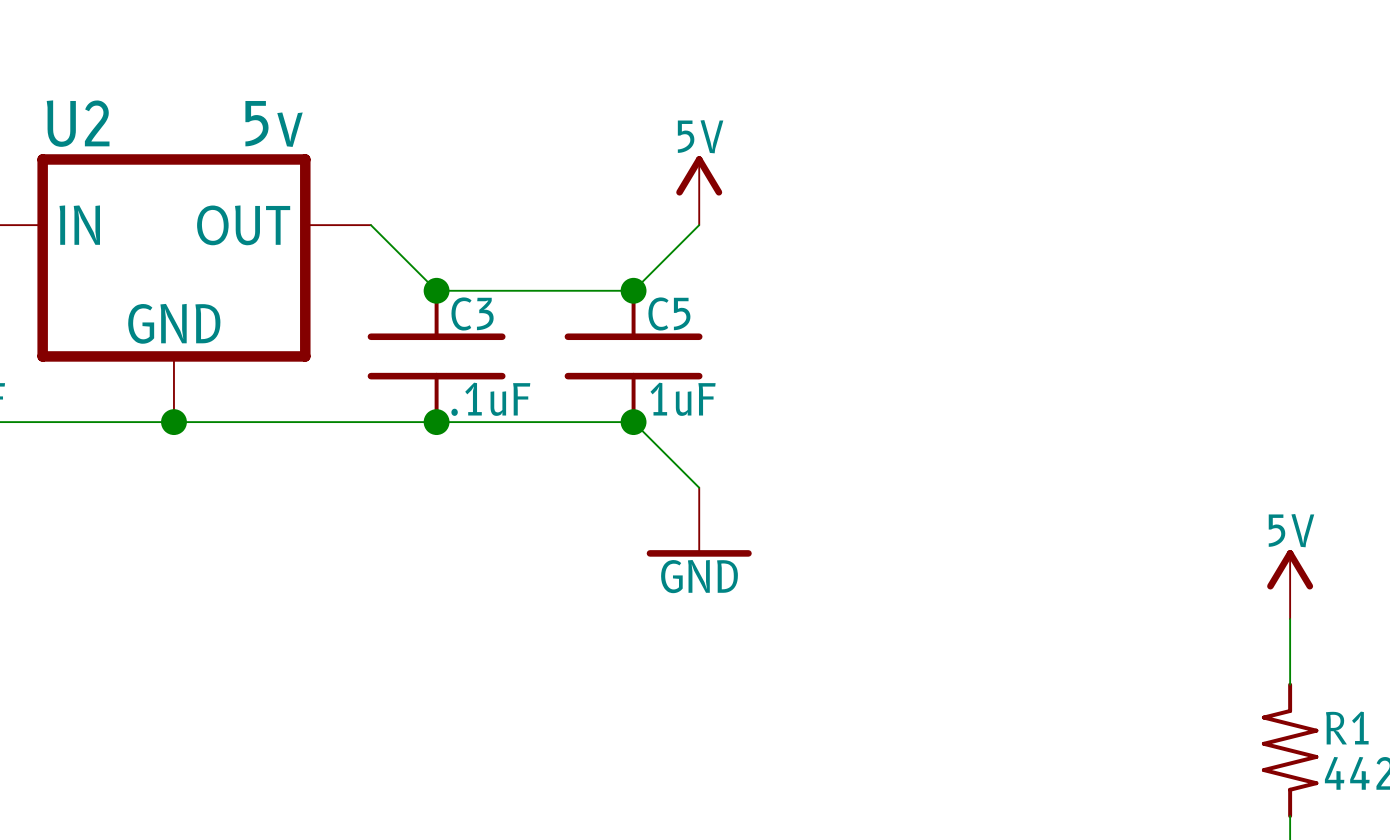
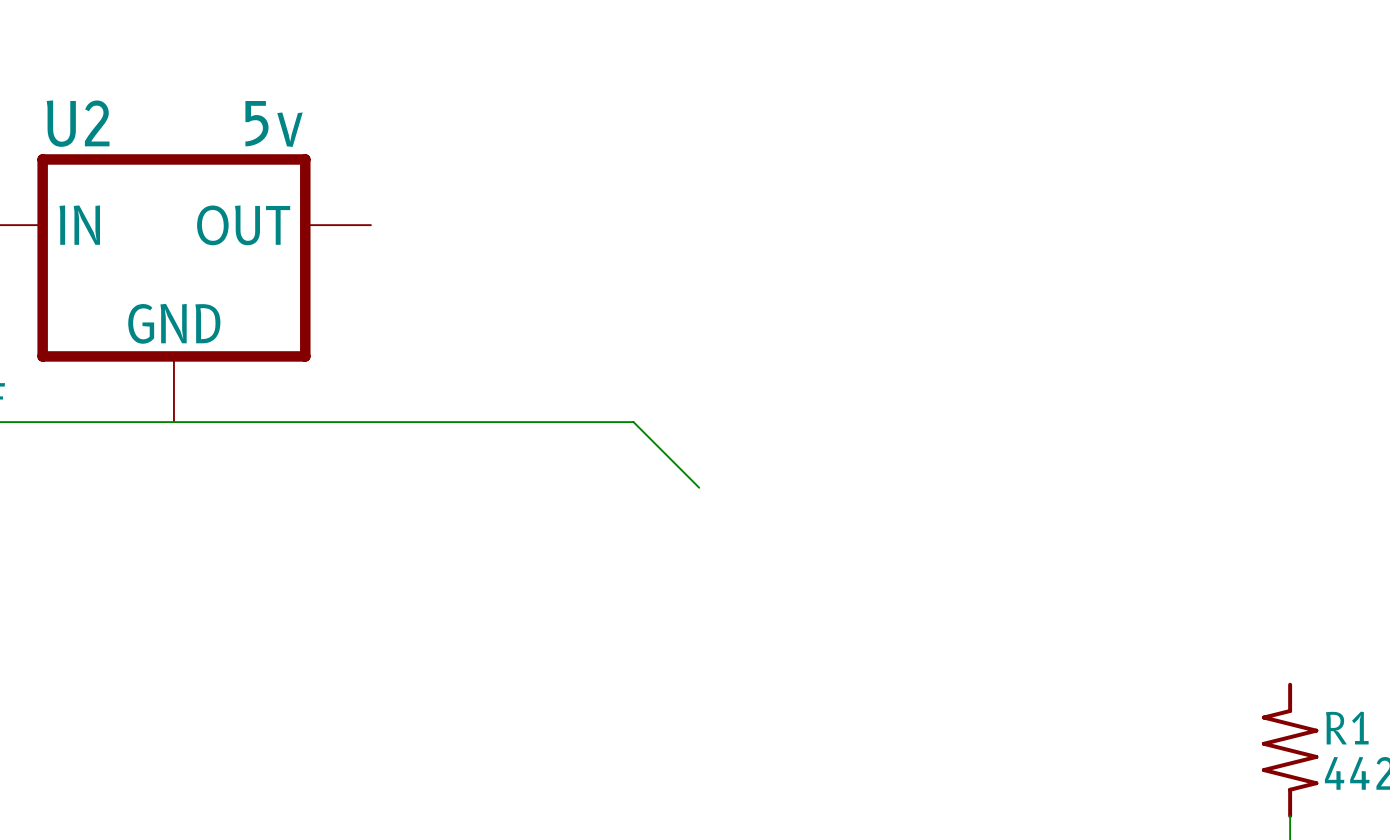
power symbol: 5V (699, 190) -> none
wire: (370, 225) (436, 290) (633, 290) (699, 225) -> none
junction: (436, 290) -> none
junction: (633, 290) -> none
C3: .1uF (436, 356) -> none
C5: 1uF (633, 356) -> none
junction: (173, 422) -> none
junction: (436, 422) -> none
junction: (633, 422) -> none
power symbol: GND (699, 522) -> none
power symbol: 5V (1290, 584) -> none
wire: (1290, 619) (1290, 684) -> none

